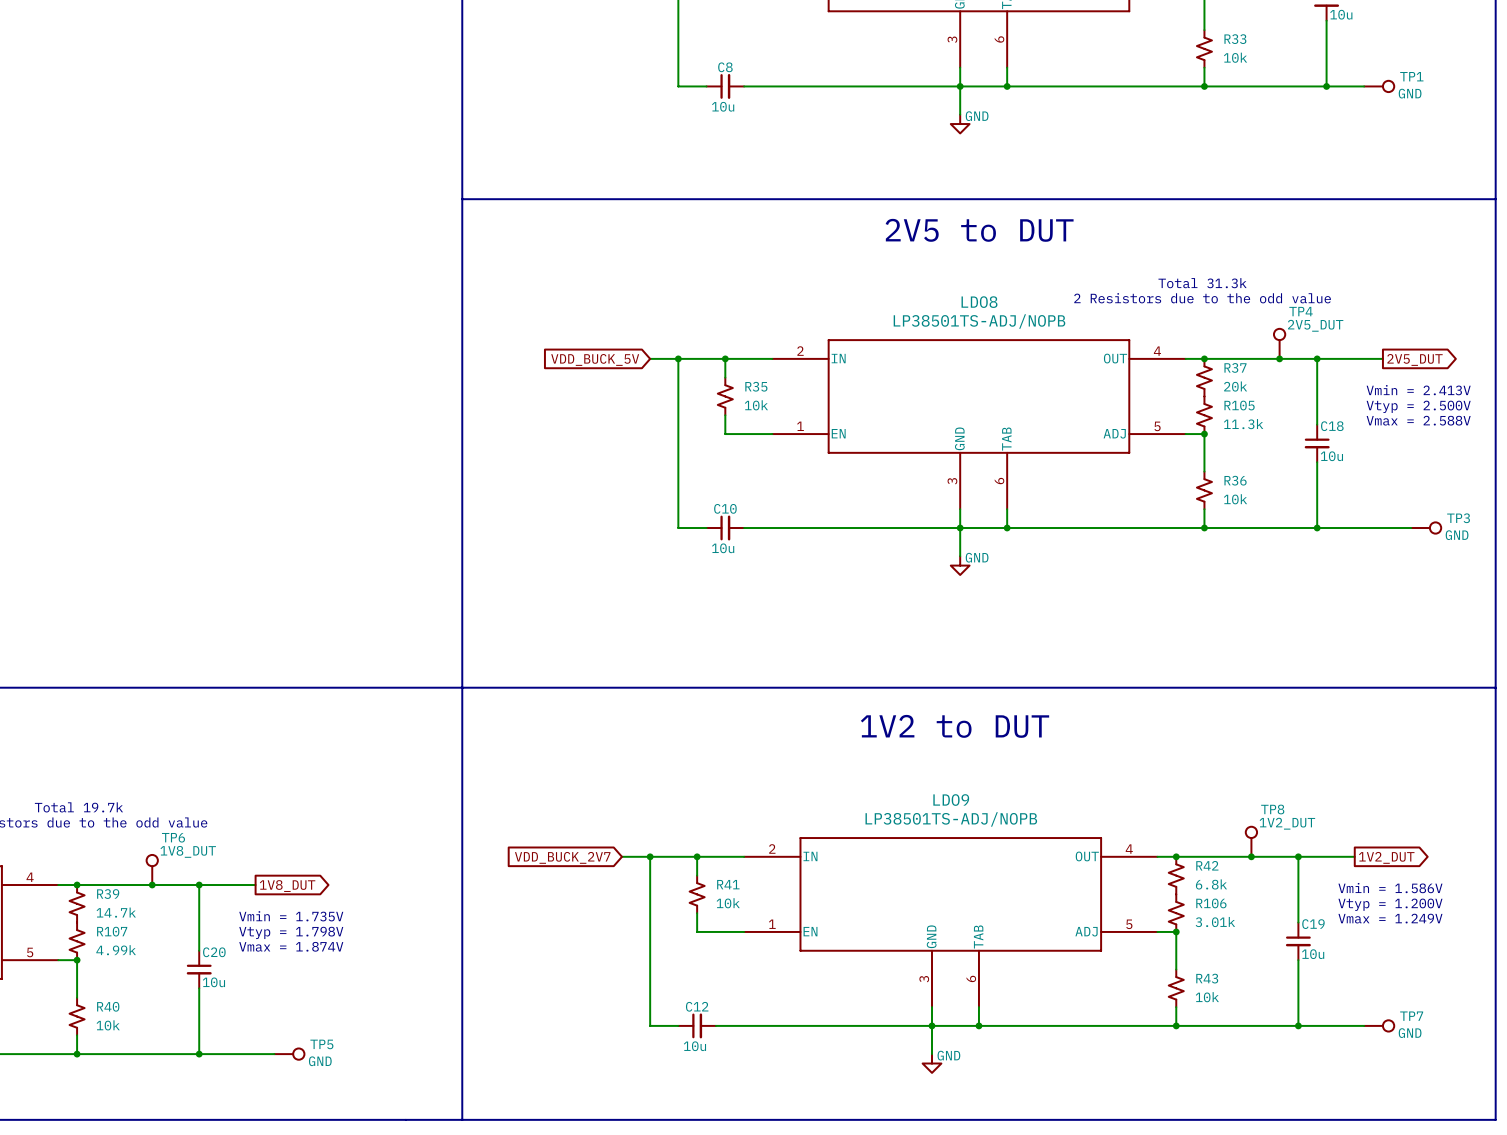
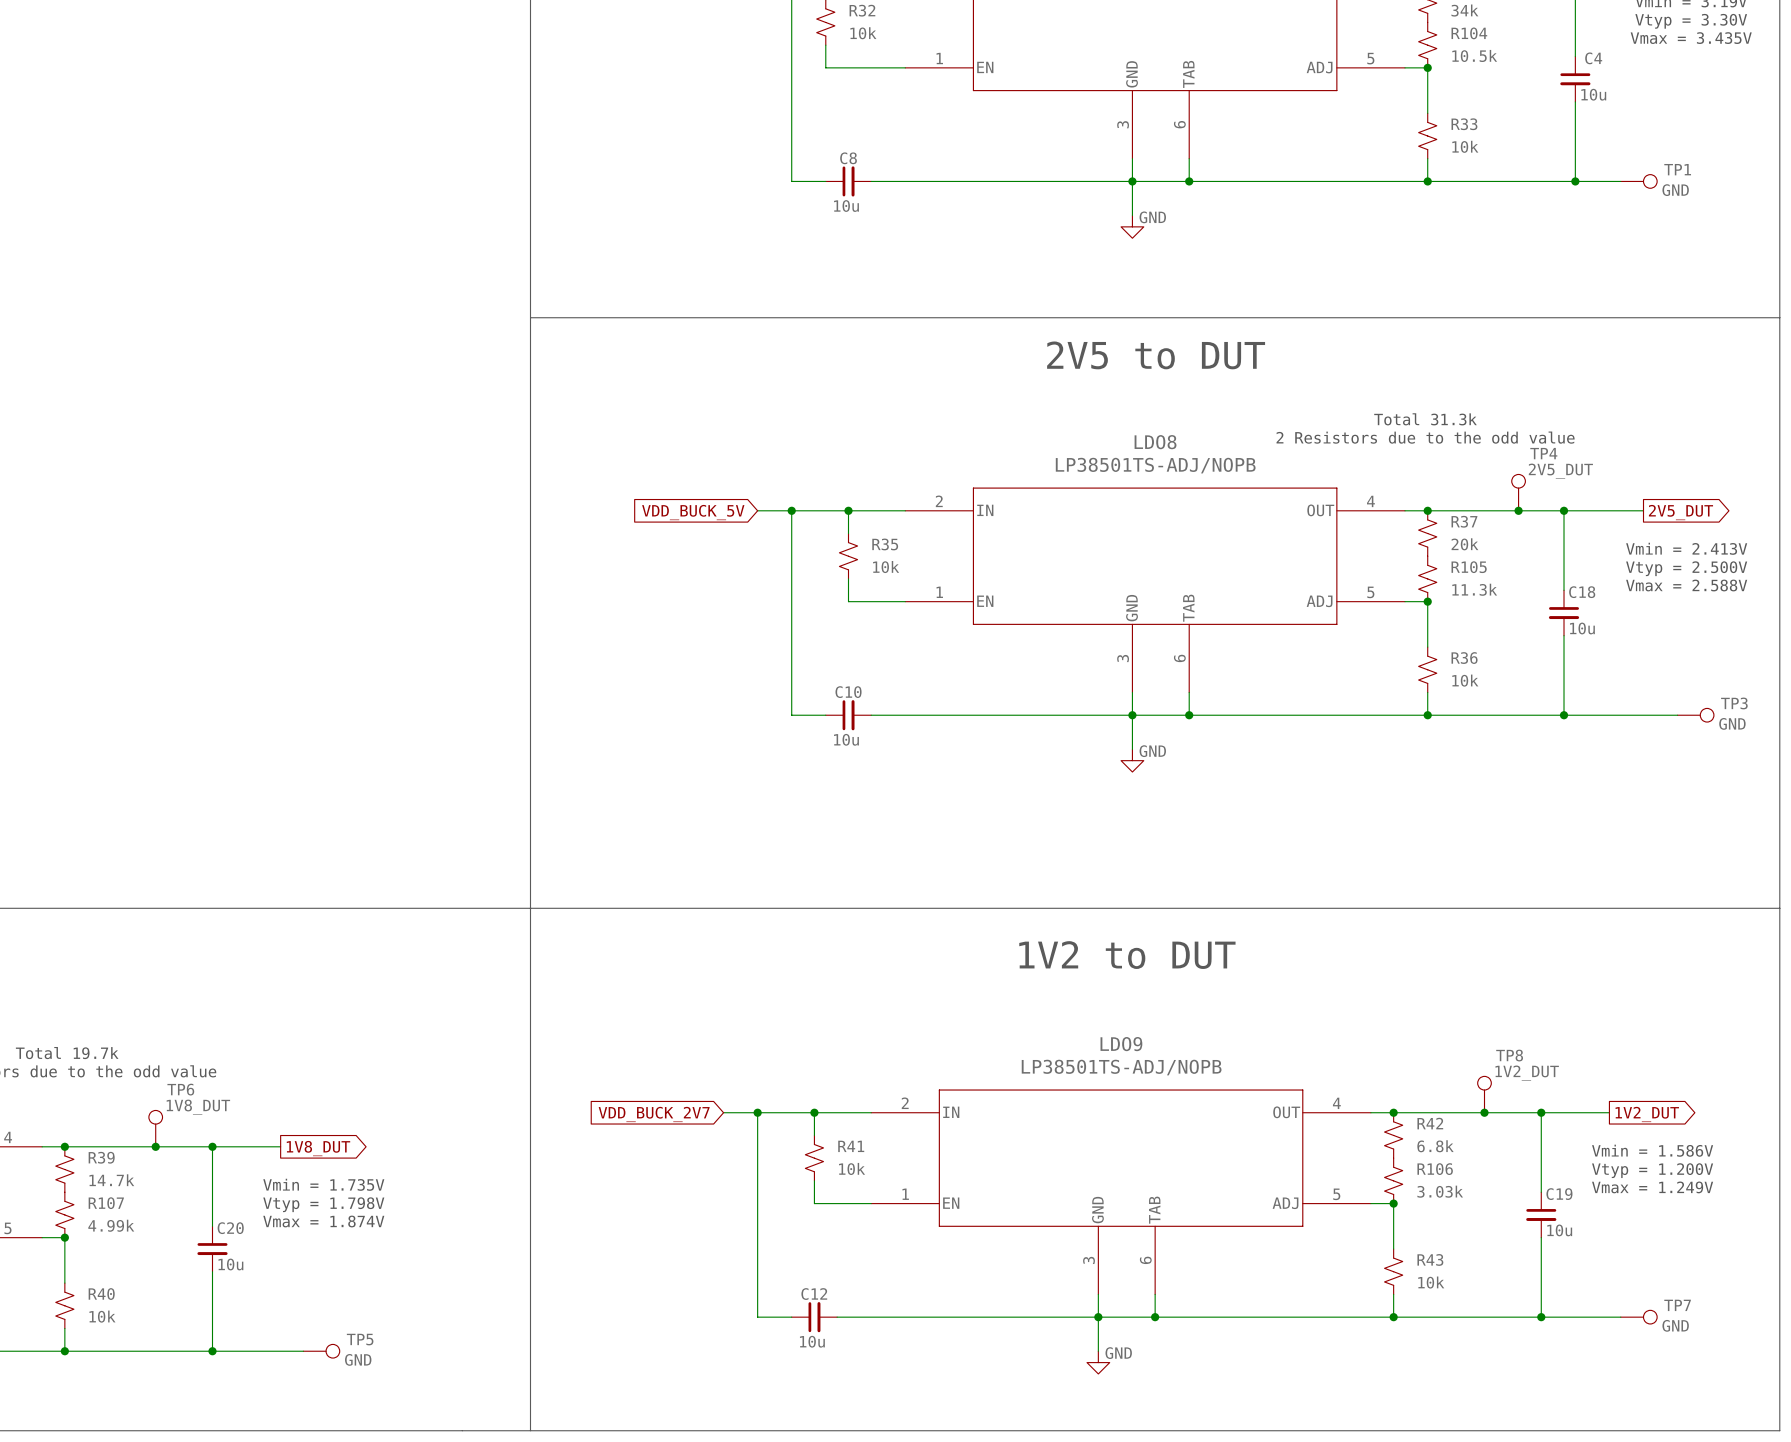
R106 value: 3.01k (1215, 922) -> 3.03k (1440, 1191)

